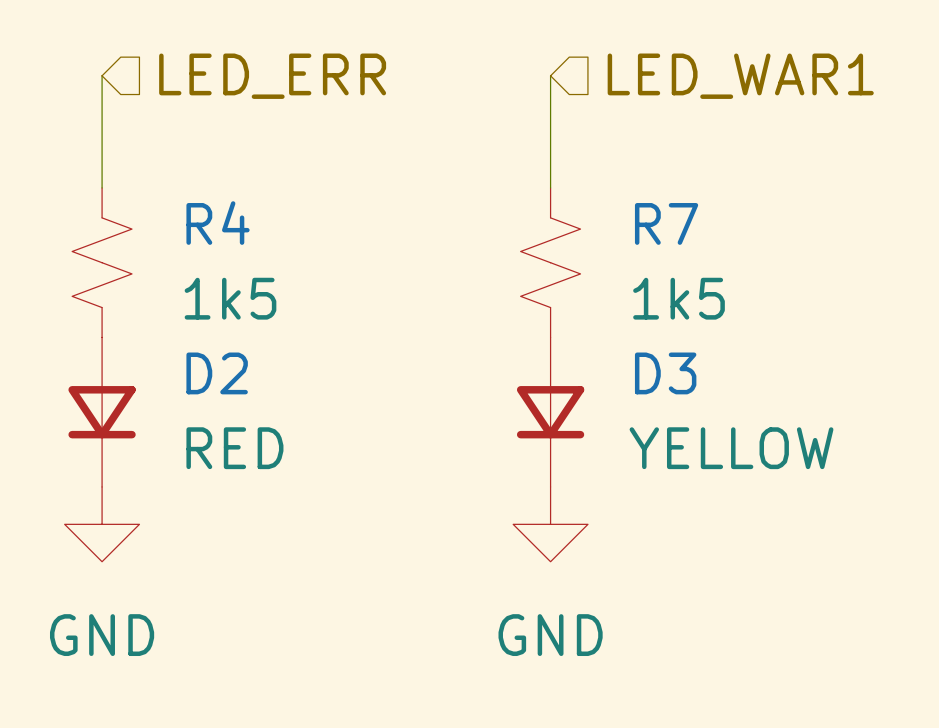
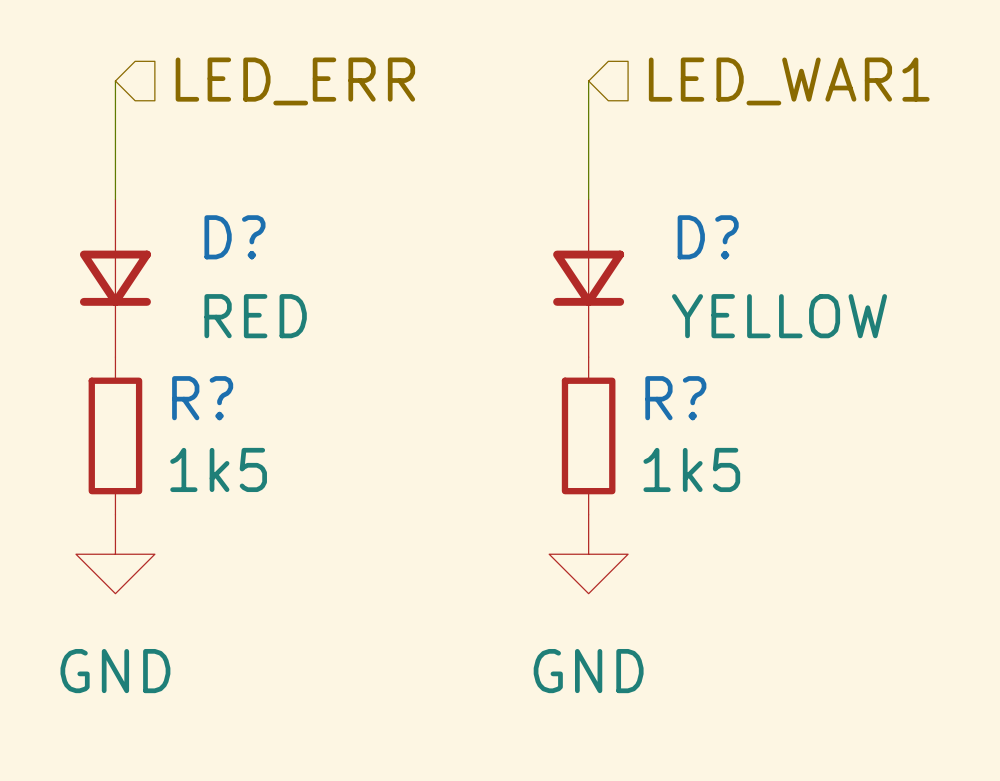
R4: 1k5 (102, 262) -> none
D?: none -> RED (115, 278)
R7: 1k5 (550, 262) -> none
D?: none -> YELLOW (588, 278)
D2: RED (102, 412) -> none
R?: none -> 1k5 (115, 435)
D3: YELLOW (550, 412) -> none
R?: none -> 1k5 (588, 435)

